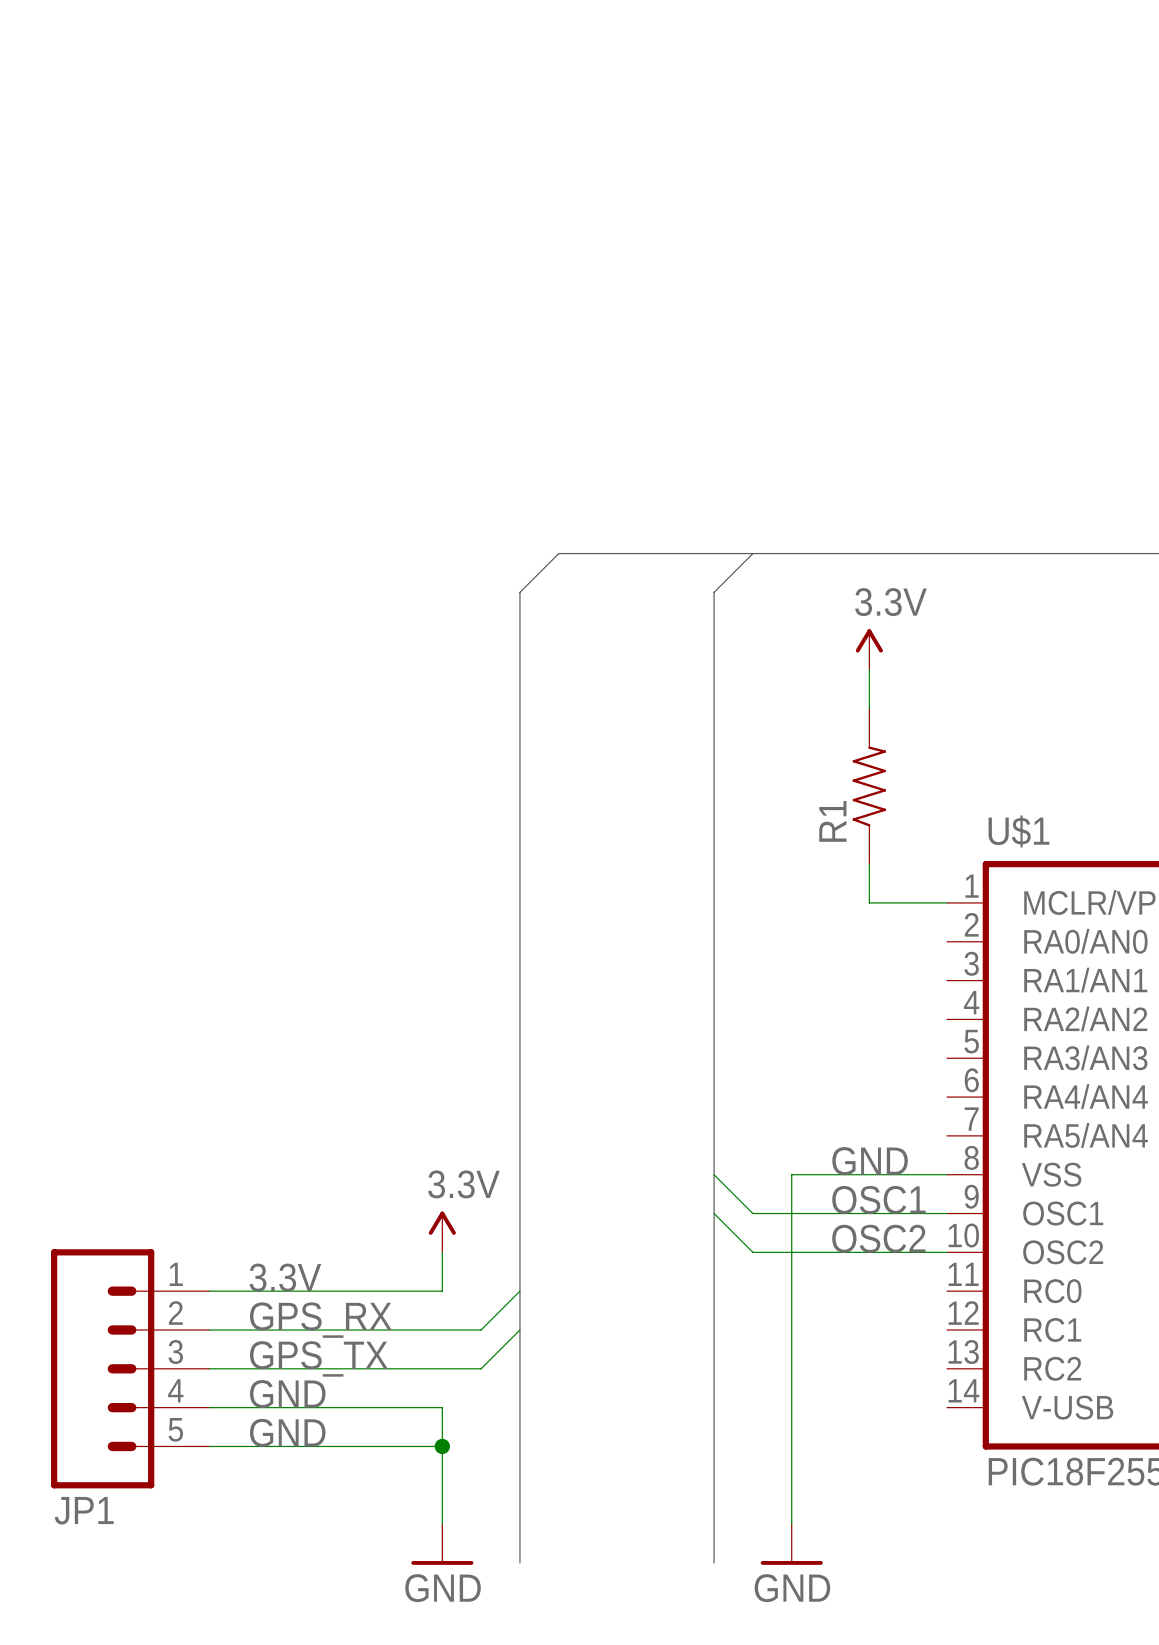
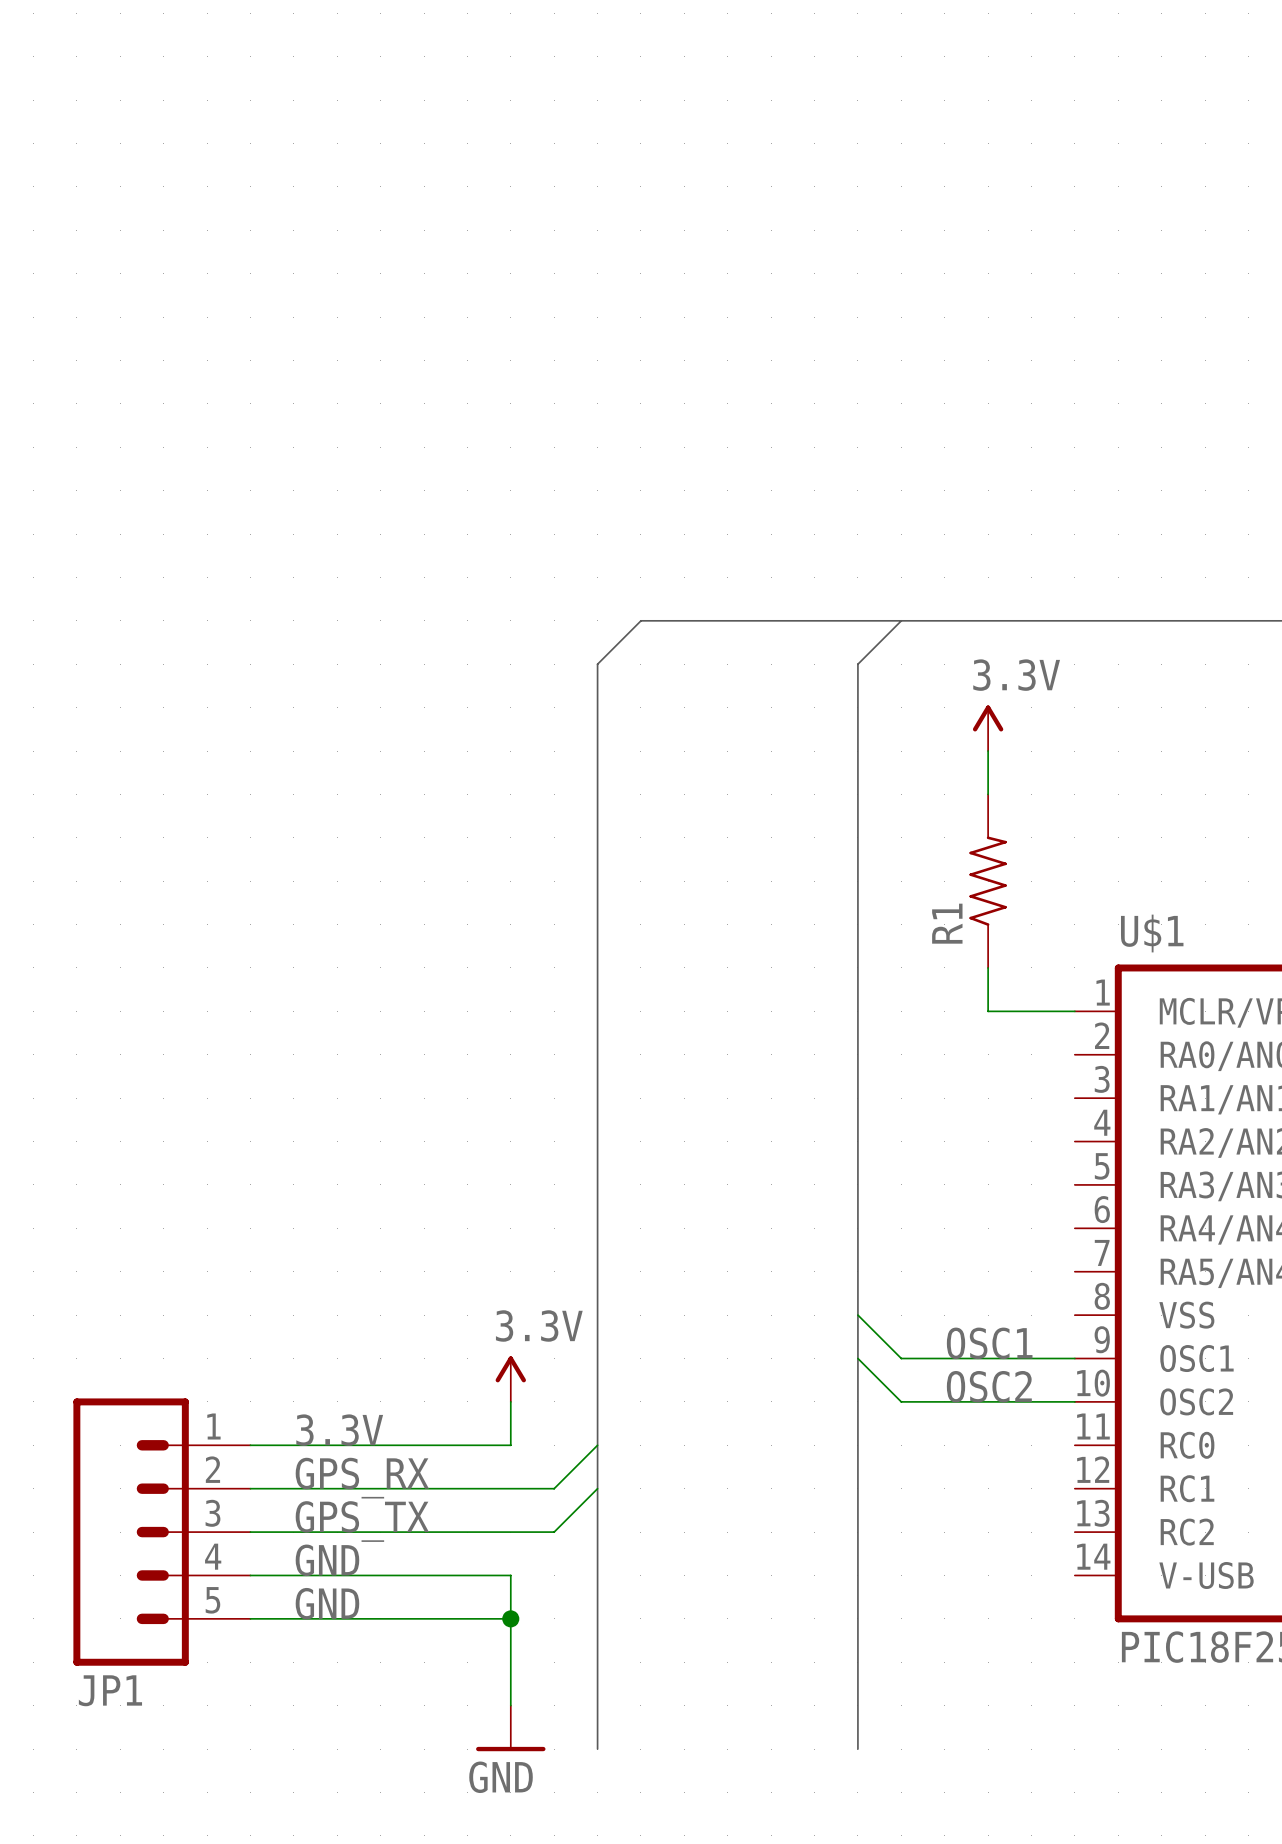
bus: (752, 553) (714, 592) (714, 1562) -> (901, 620) (857, 664) (857, 1749)
label: GND (870, 1161) -> none
wire: (714, 1174) (752, 1213) (791, 1213) -> (857, 1315) (901, 1358)
wire: (947, 1174) (791, 1174) (791, 1524) -> none
wire: (714, 1213) (752, 1252) (791, 1252) -> (857, 1358) (901, 1401)
power symbol: GND (791, 1544) -> none

